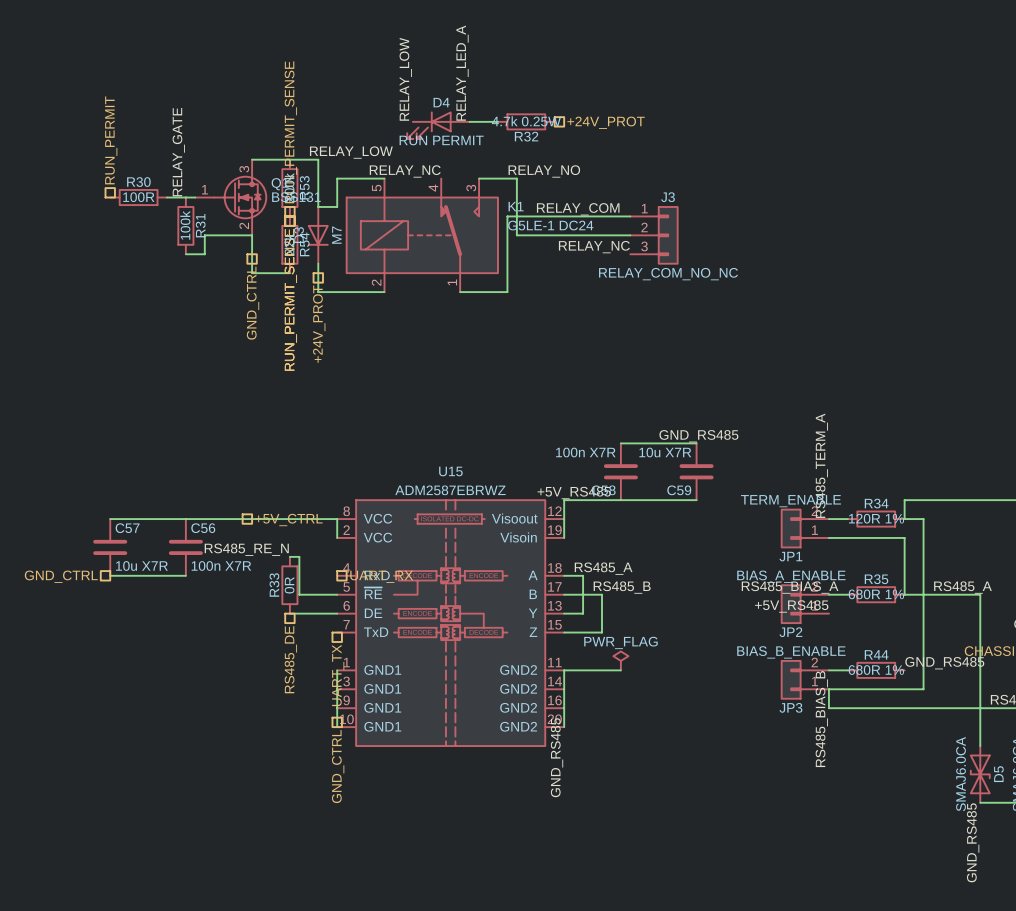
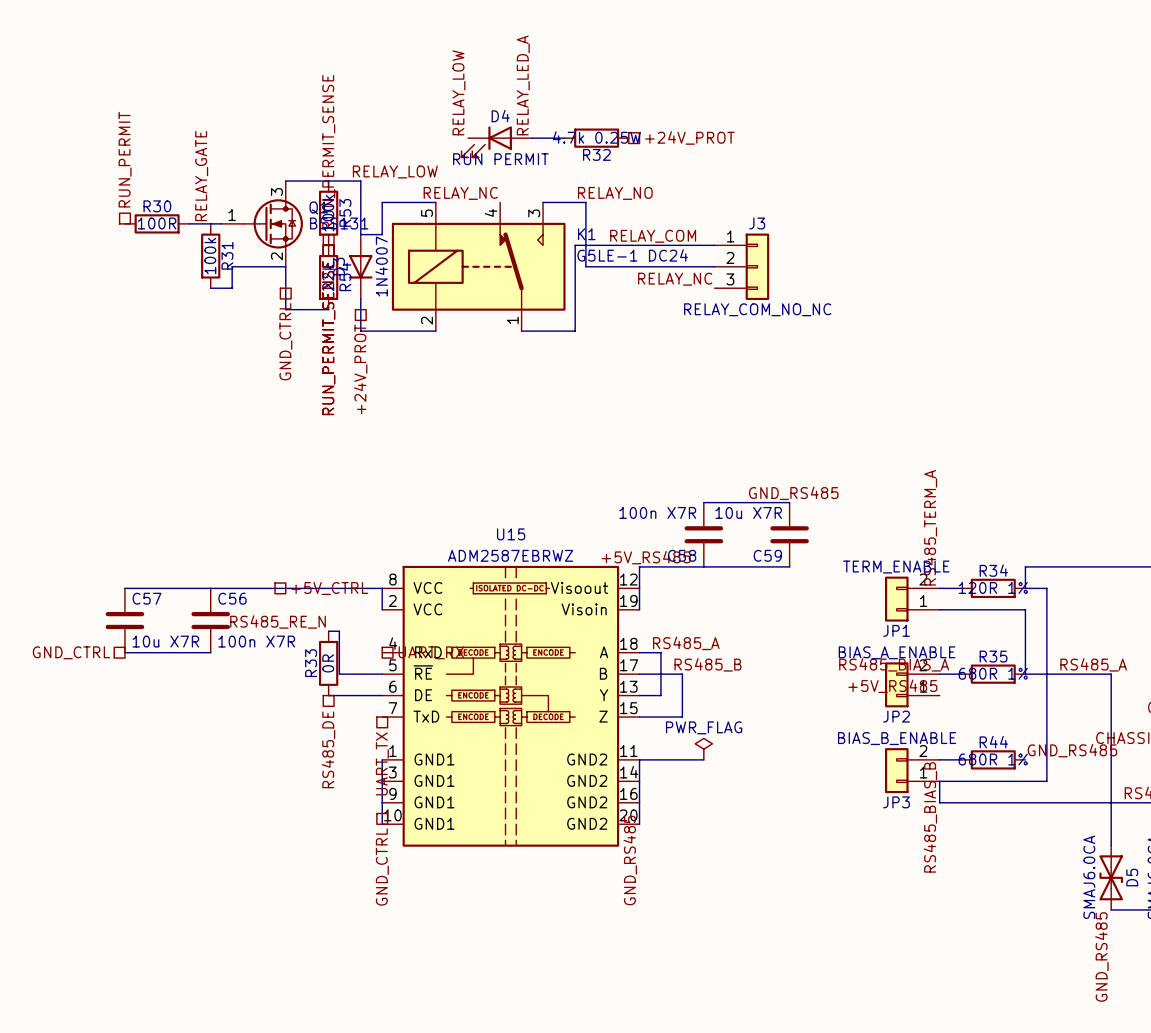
D3 value: M7 (336, 235) -> 1N4007 (381, 266)

